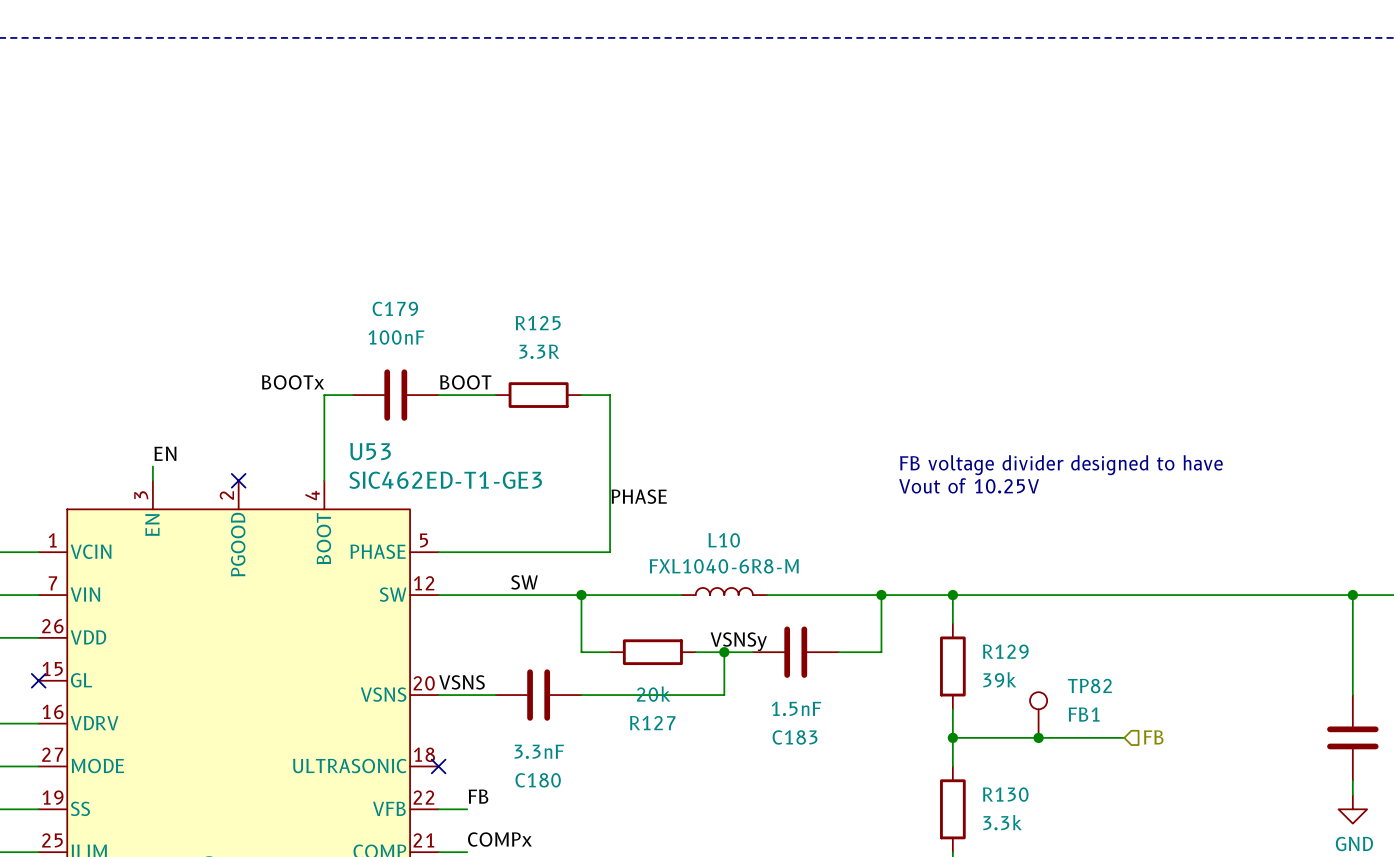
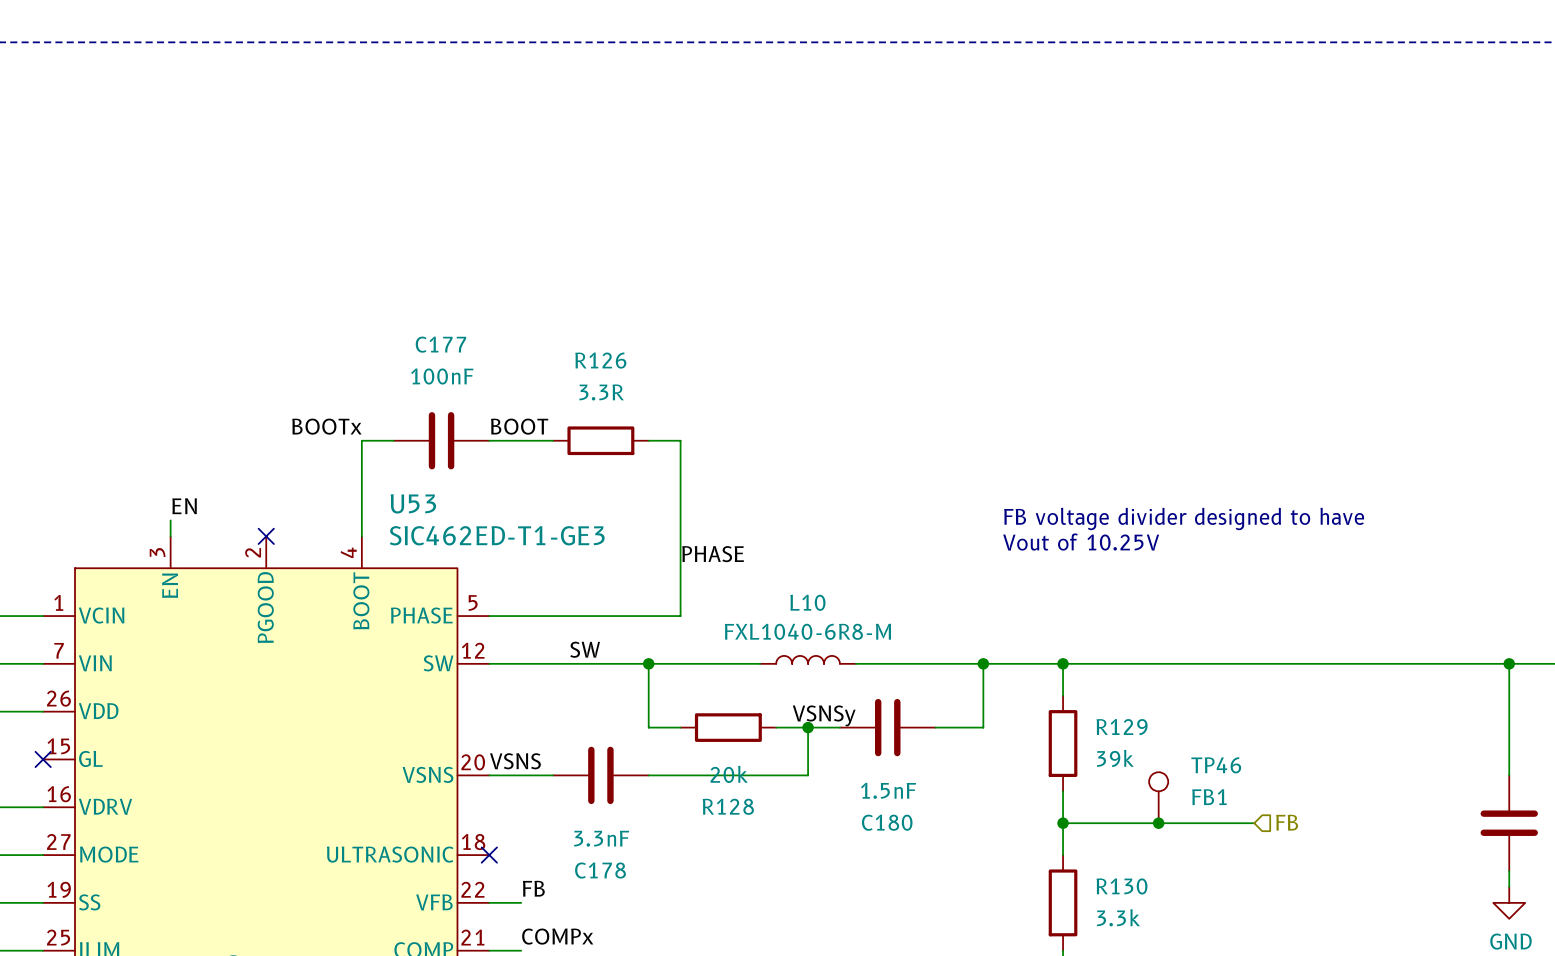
C179 name: C179 (395, 308) -> C177 (440, 344)
R125 name: R125 (538, 323) -> R126 (600, 360)
TP82 name: TP82 (1089, 686) -> TP46 (1216, 765)
R127 name: R127 (652, 723) -> R128 (728, 806)
C183 name: C183 (795, 737) -> C180 (887, 822)
C180 name: C180 (538, 780) -> C178 (600, 870)

